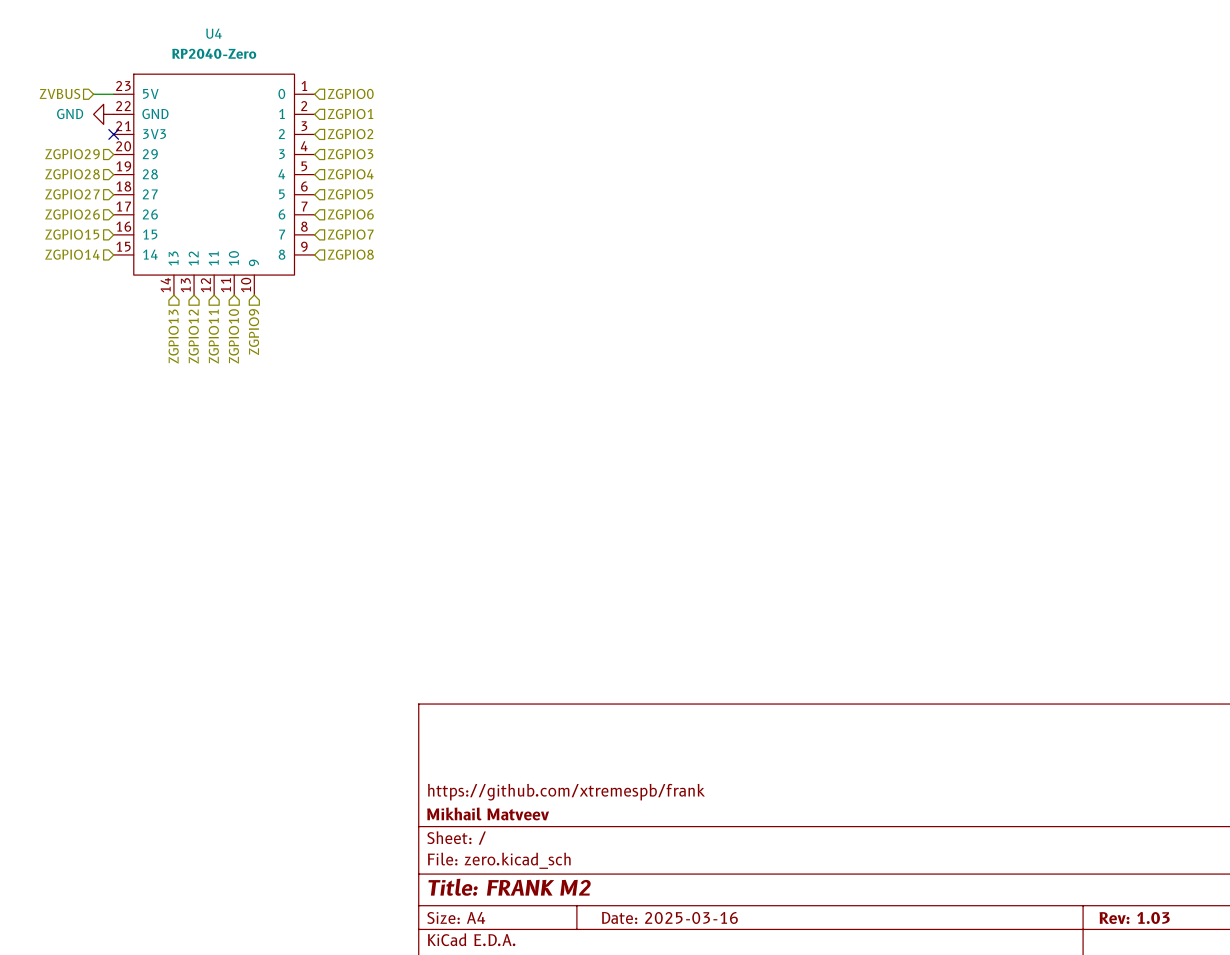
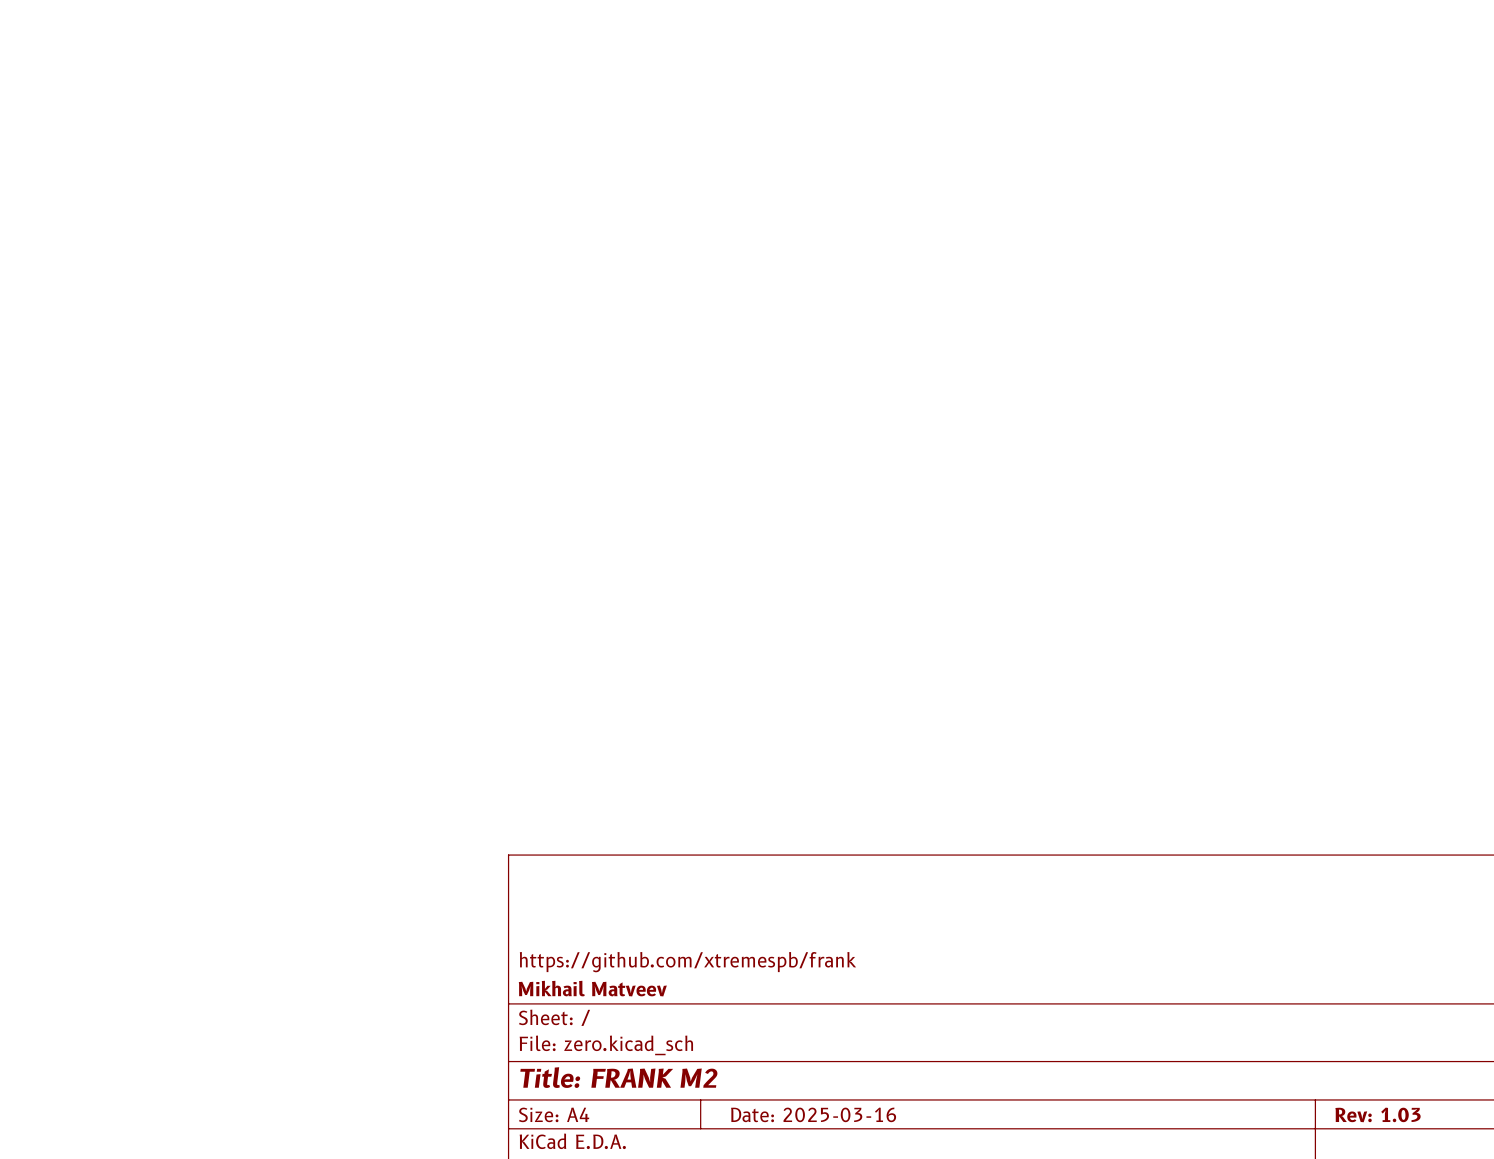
hierarchical label: ZVBUS (59, 93) -> none
hierarchical label: ZGPIO0 (350, 93) -> none
wire: (93, 94) (113, 94) -> none
power symbol: GND (103, 114) -> none
hierarchical label: ZGPIO1 (350, 114) -> none
no-connect mark: (113, 134) -> none
hierarchical label: ZGPIO2 (350, 134) -> none
hierarchical label: ZGPIO29 (72, 154) -> none
hierarchical label: ZGPIO3 (350, 154) -> none
hierarchical label: ZGPIO28 (72, 174) -> none
hierarchical label: ZGPIO4 (350, 174) -> none
U4: RP2040-Zero (214, 184) -> none
hierarchical label: ZGPIO27 (72, 194) -> none
hierarchical label: ZGPIO5 (350, 194) -> none
hierarchical label: ZGPIO26 (72, 214) -> none
hierarchical label: ZGPIO6 (350, 214) -> none
hierarchical label: ZGPIO15 (72, 234) -> none
hierarchical label: ZGPIO7 (350, 234) -> none
hierarchical label: ZGPIO14 (72, 254) -> none
hierarchical label: ZGPIO8 (350, 254) -> none
hierarchical label: ZGPIO9 (253, 332) -> none
hierarchical label: ZGPIO13 (173, 336) -> none
hierarchical label: ZGPIO12 (193, 336) -> none
hierarchical label: ZGPIO11 (213, 336) -> none
hierarchical label: ZGPIO10 (233, 336) -> none

